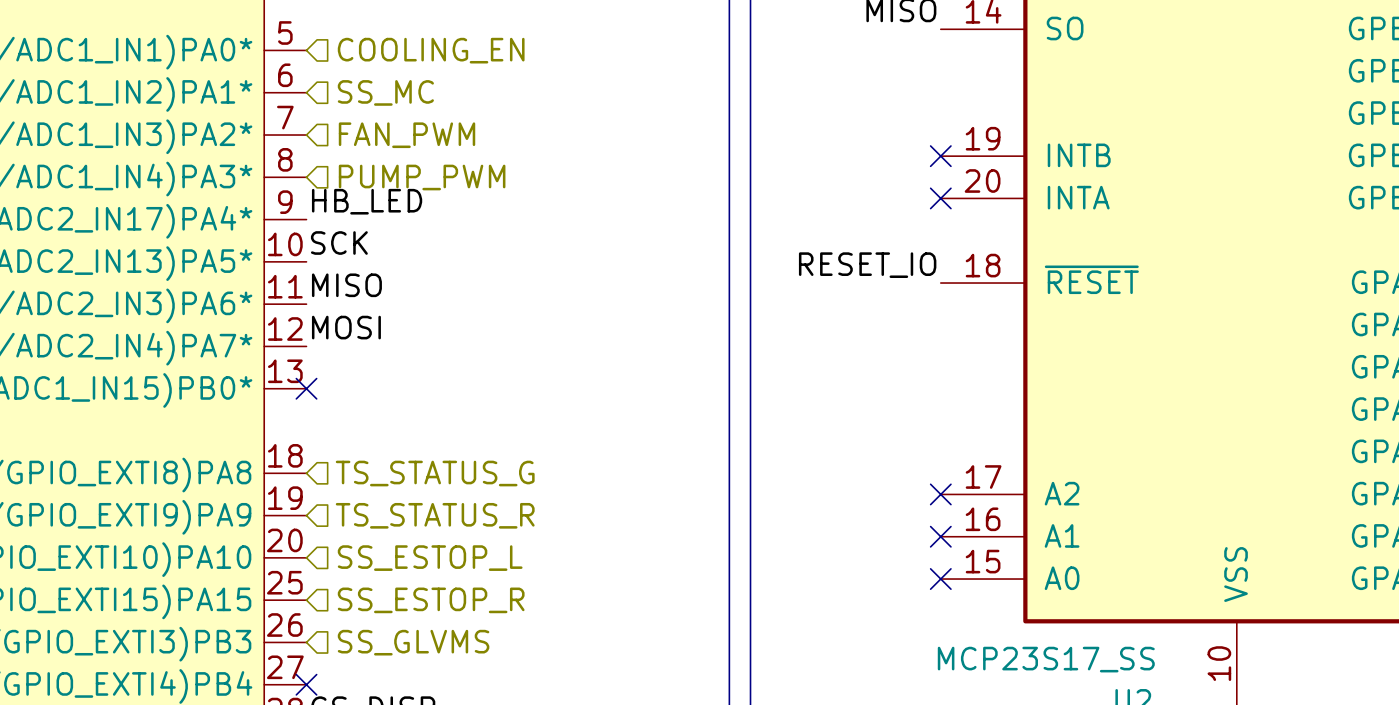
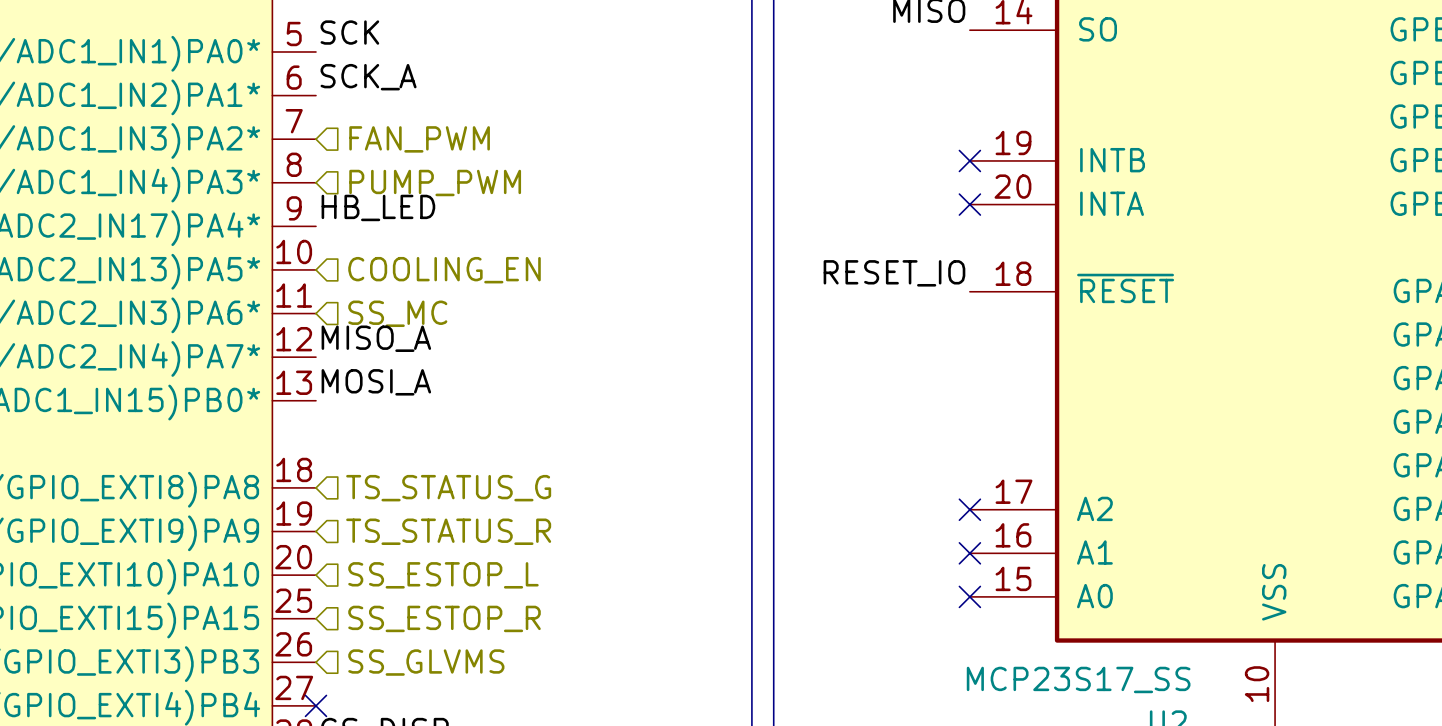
hierarchical label position: COOLING_EN (431, 50) -> COOLING_EN (444, 270)
label: none -> SCK_A (368, 77)
hierarchical label position: SS_MC (385, 92) -> SS_MC (397, 313)
label position: SCK (339, 243) -> SCK (349, 32)
label: MISO (346, 285) -> none
label: MOSI (346, 327) -> MISO_A (376, 338)
label: none -> MOSI_A (376, 382)
no-connect mark: (306, 388) -> none

